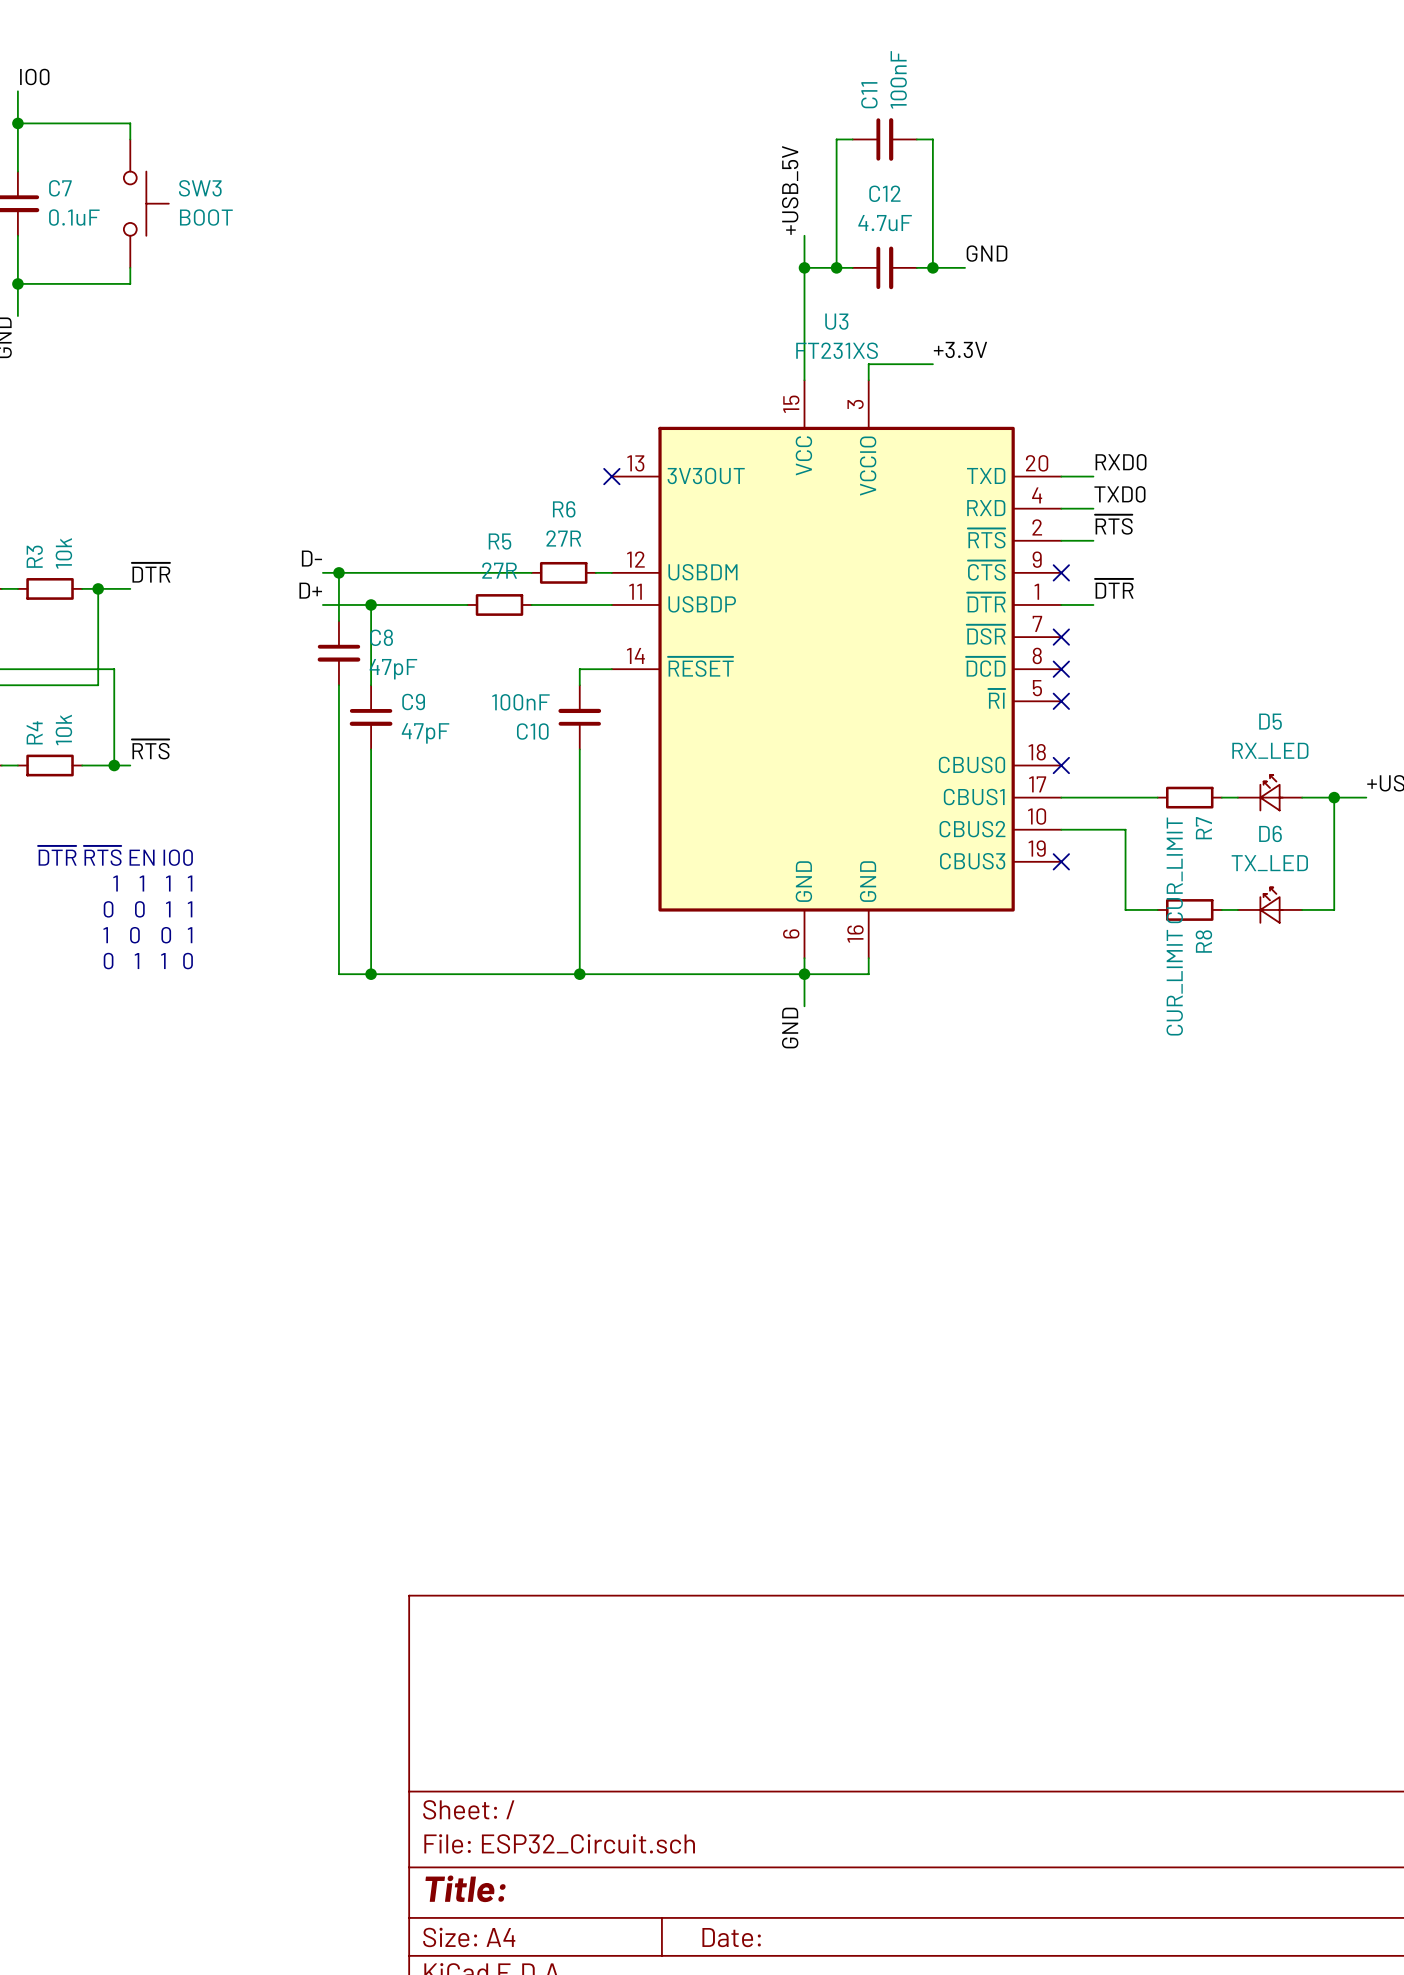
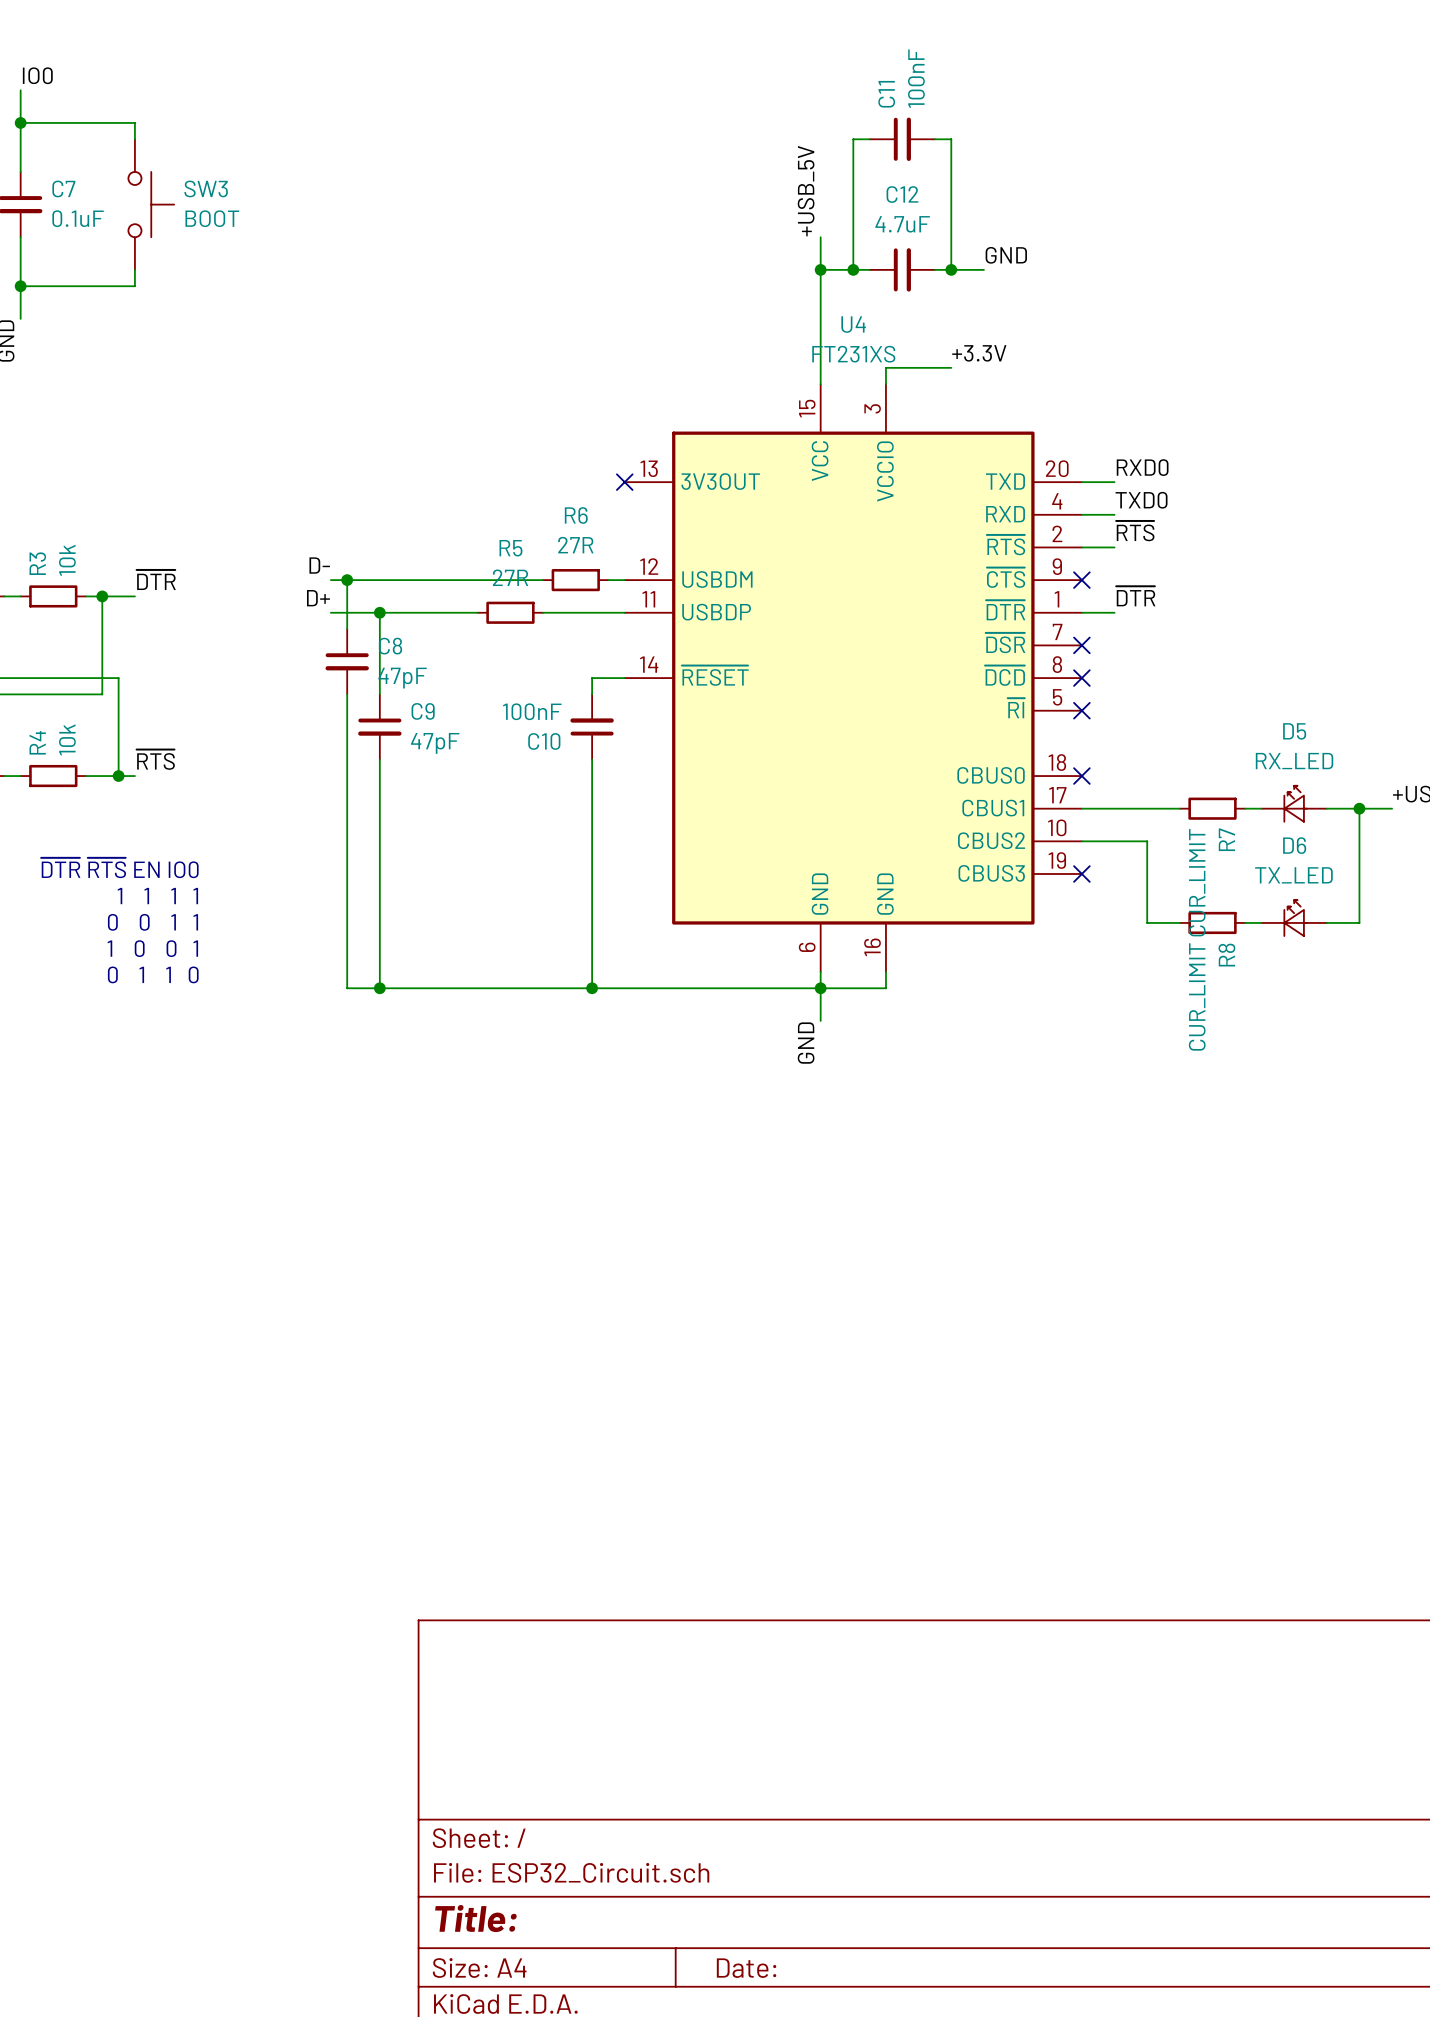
U3 name: U3 (836, 321) -> U4 (853, 324)

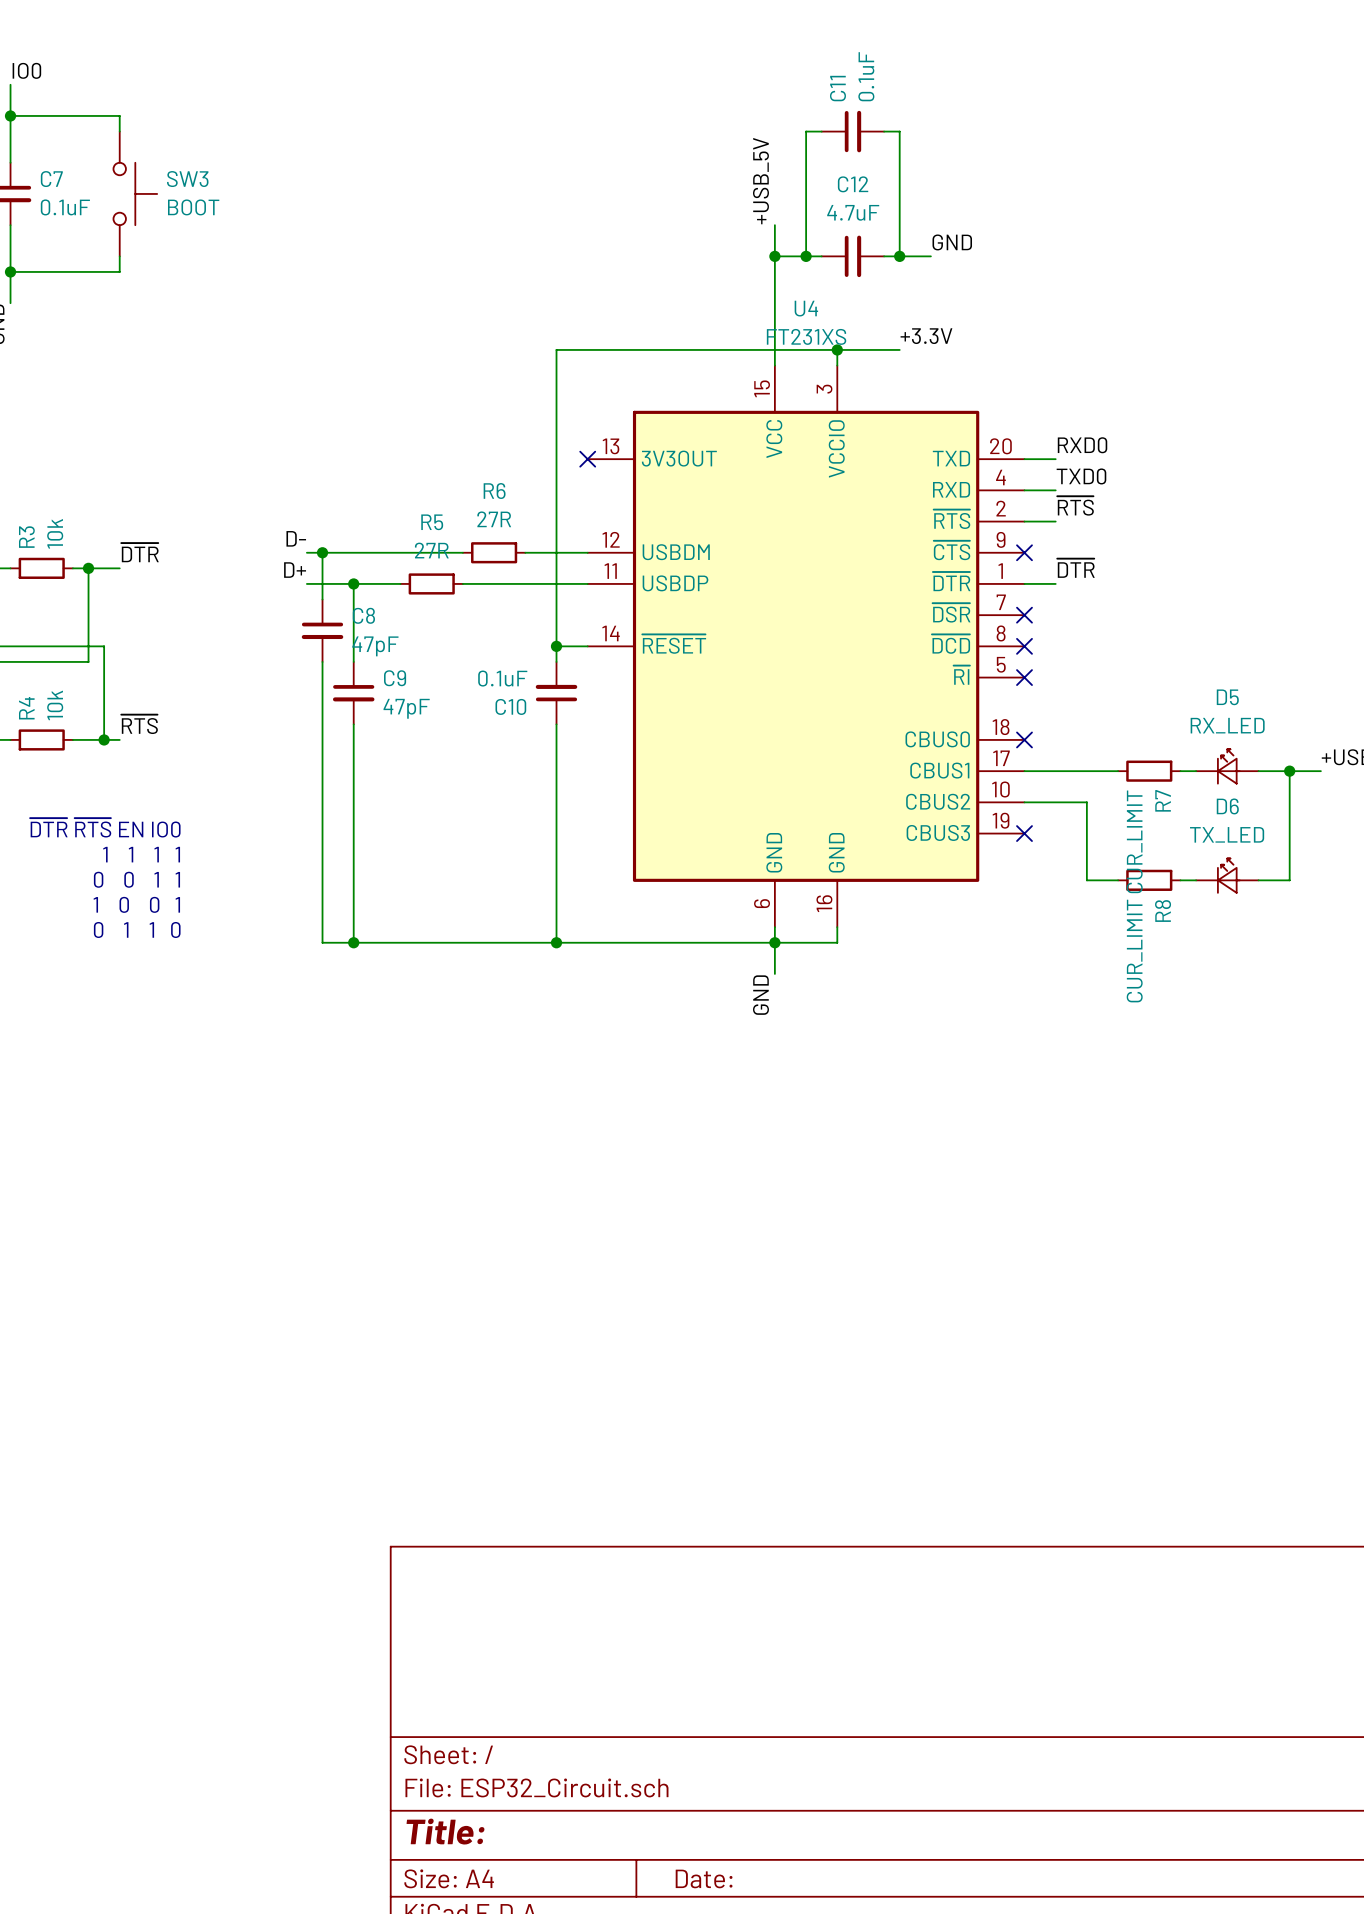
C11 value: 100nF (916, 78) -> 0.1uF (866, 76)
wire: none -> (837, 349) (556, 349) (556, 646)
junction: none -> (837, 349)
wire: (494, 580) (543, 580) -> (525, 552) (572, 552)
R6 position: (575, 580) -> (494, 552)
wire: (428, 612) (477, 612) -> (462, 583) (509, 583)
R5 position: (510, 612) -> (431, 583)
junction: none -> (556, 646)
C10 value: 100nF (532, 711) -> 0.1uF (502, 678)

